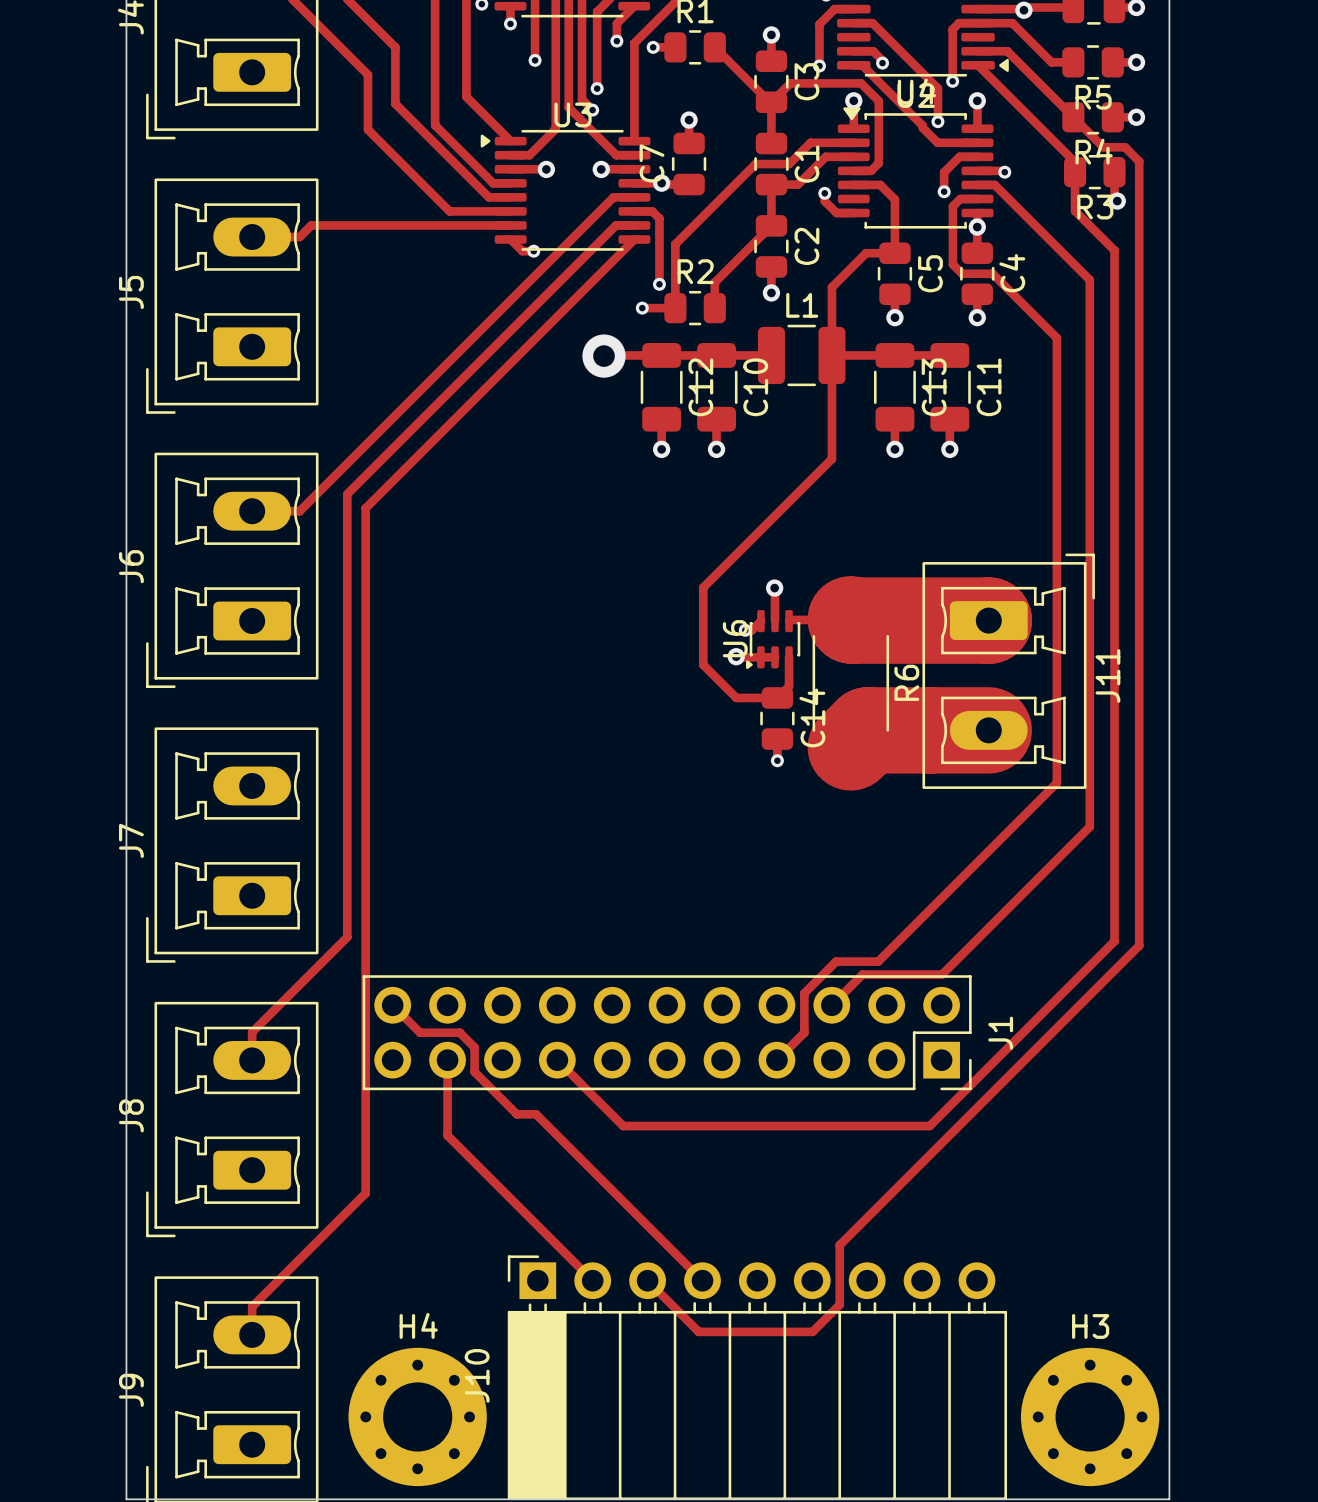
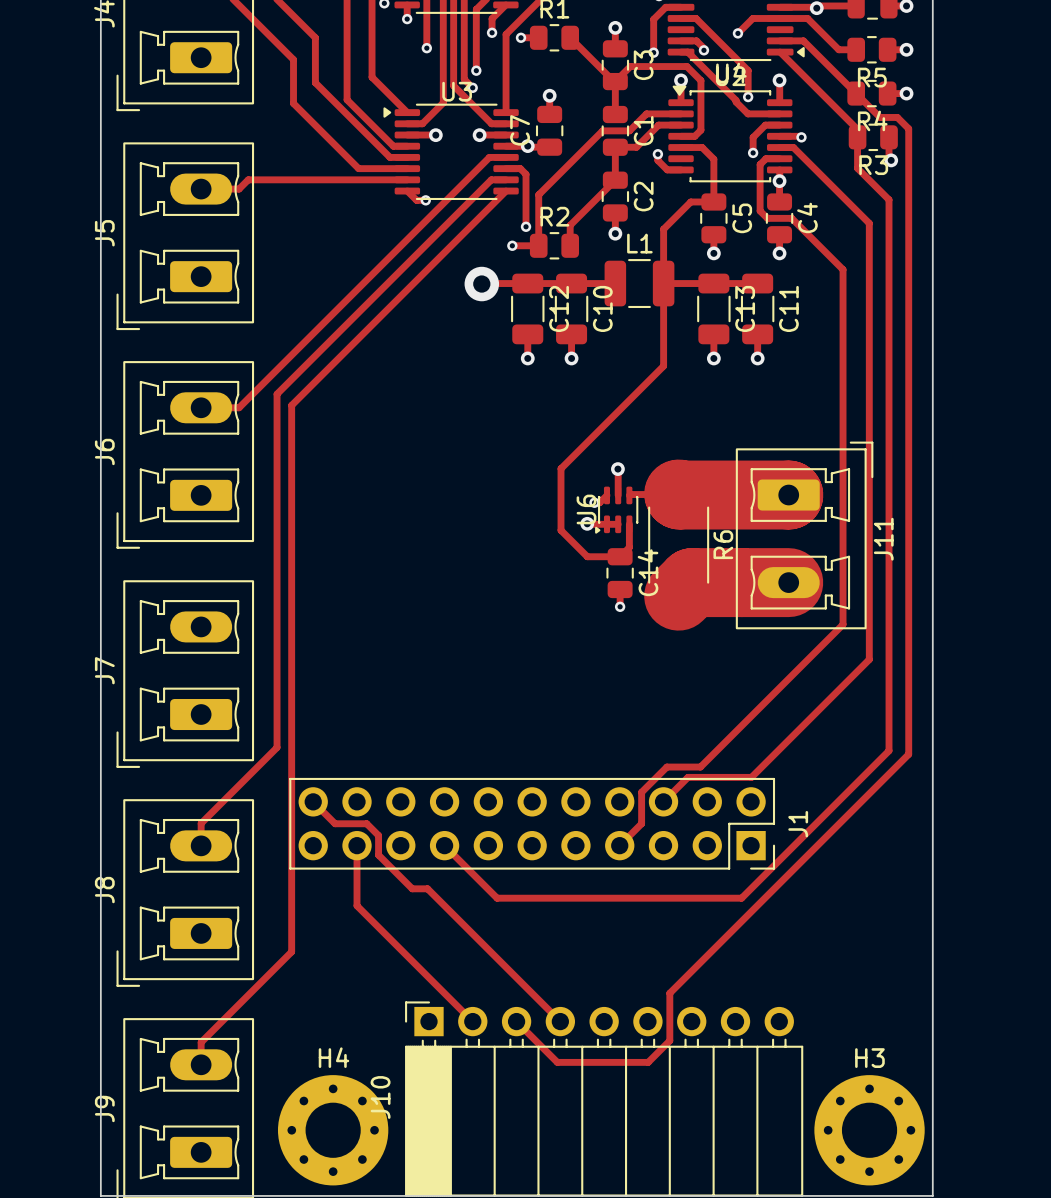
track: (958, 23) (952, 29) (952, 81) -> (764, 18) (752, 18) (737, 33)
via position: (952, 81) -> (737, 33)

